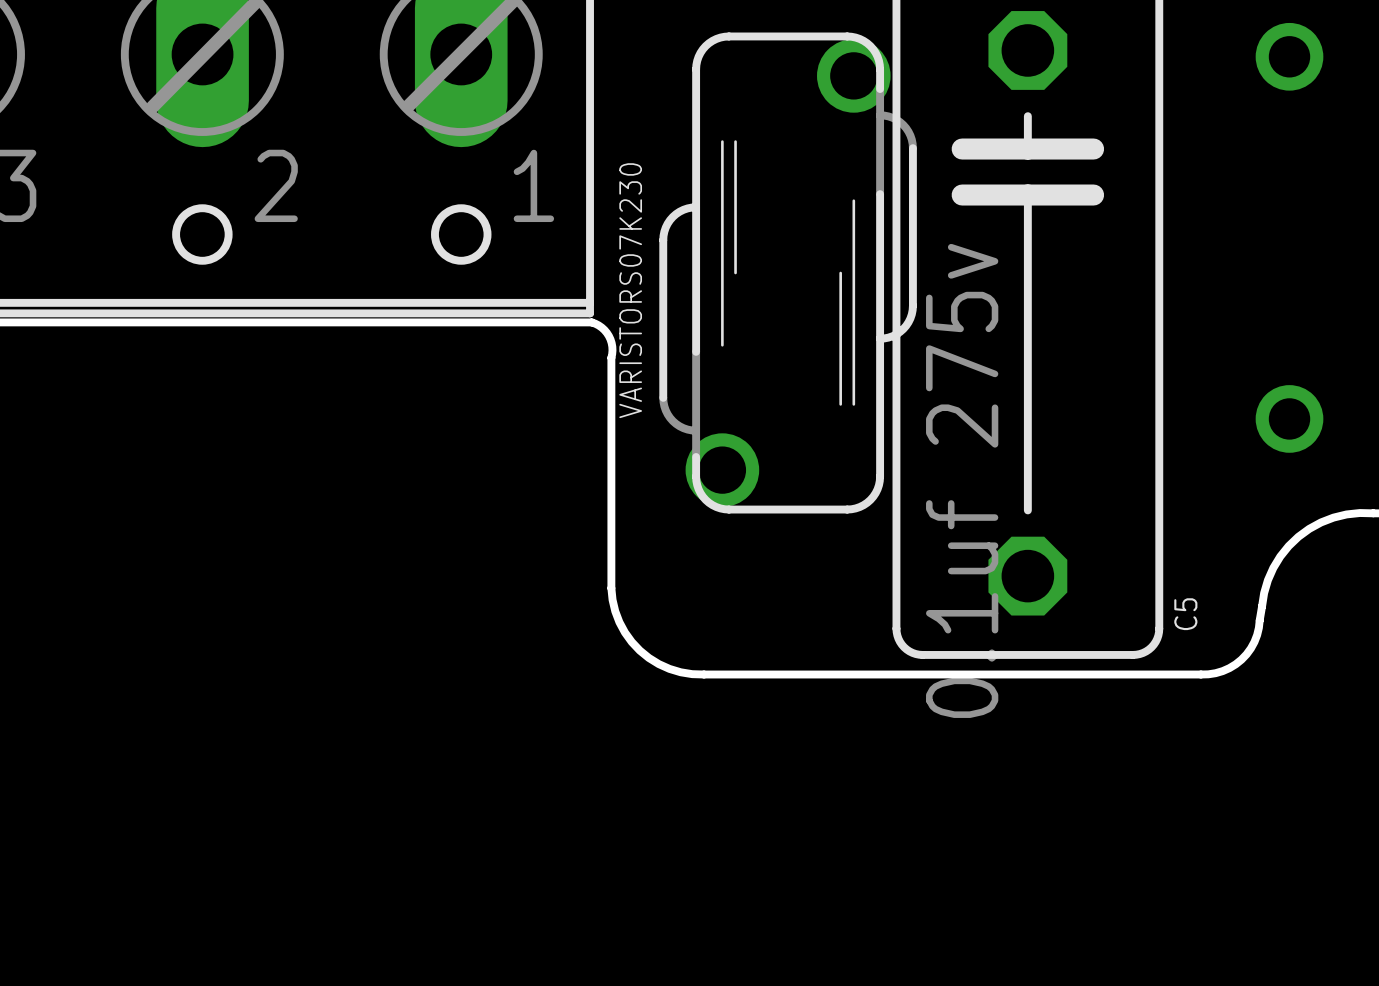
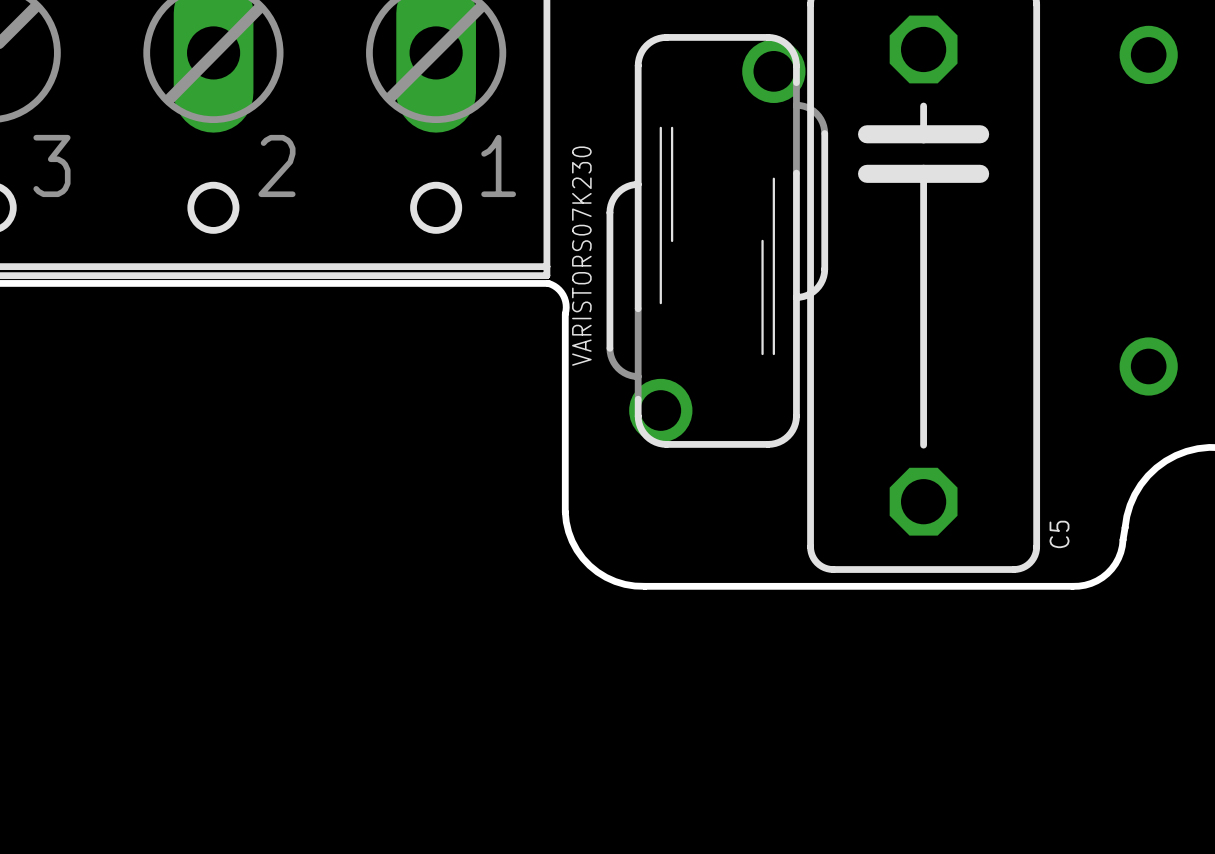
C5 value: 0.1uf 275v (962, 480) -> none

